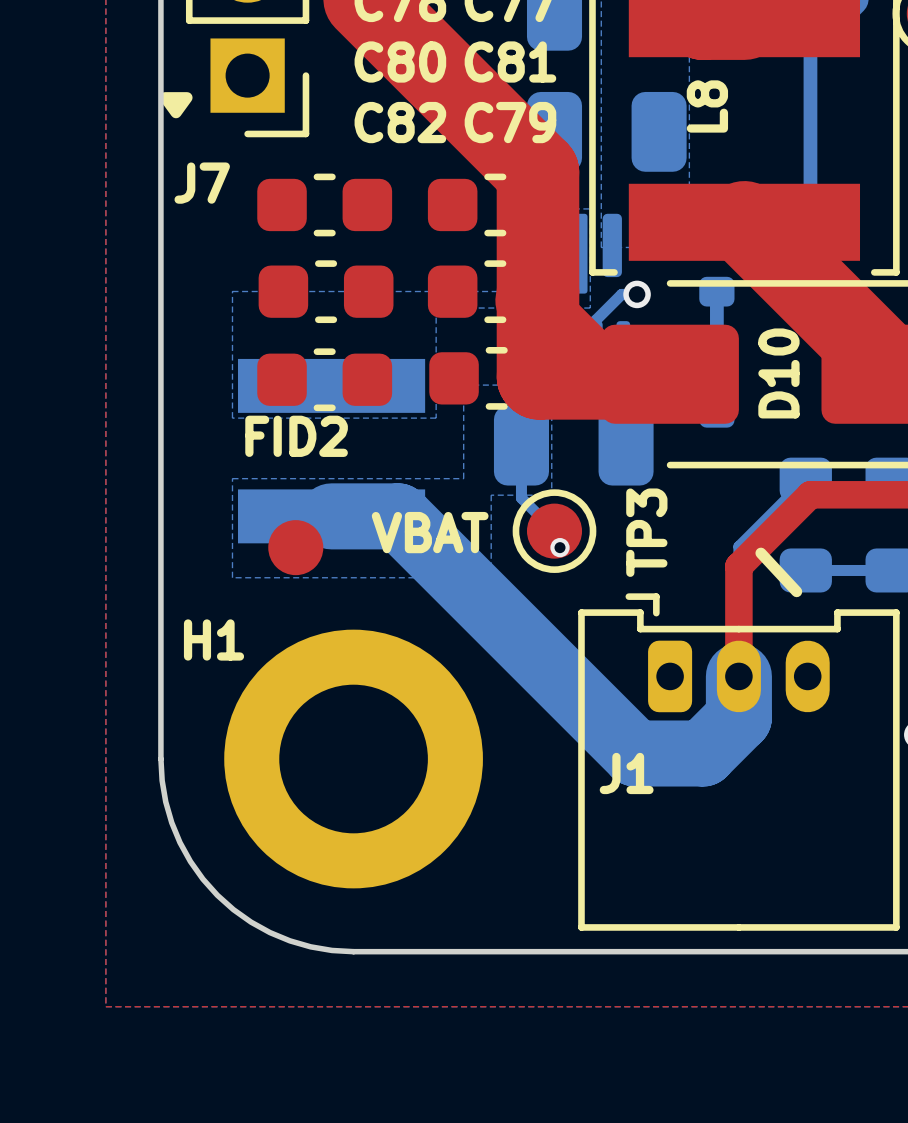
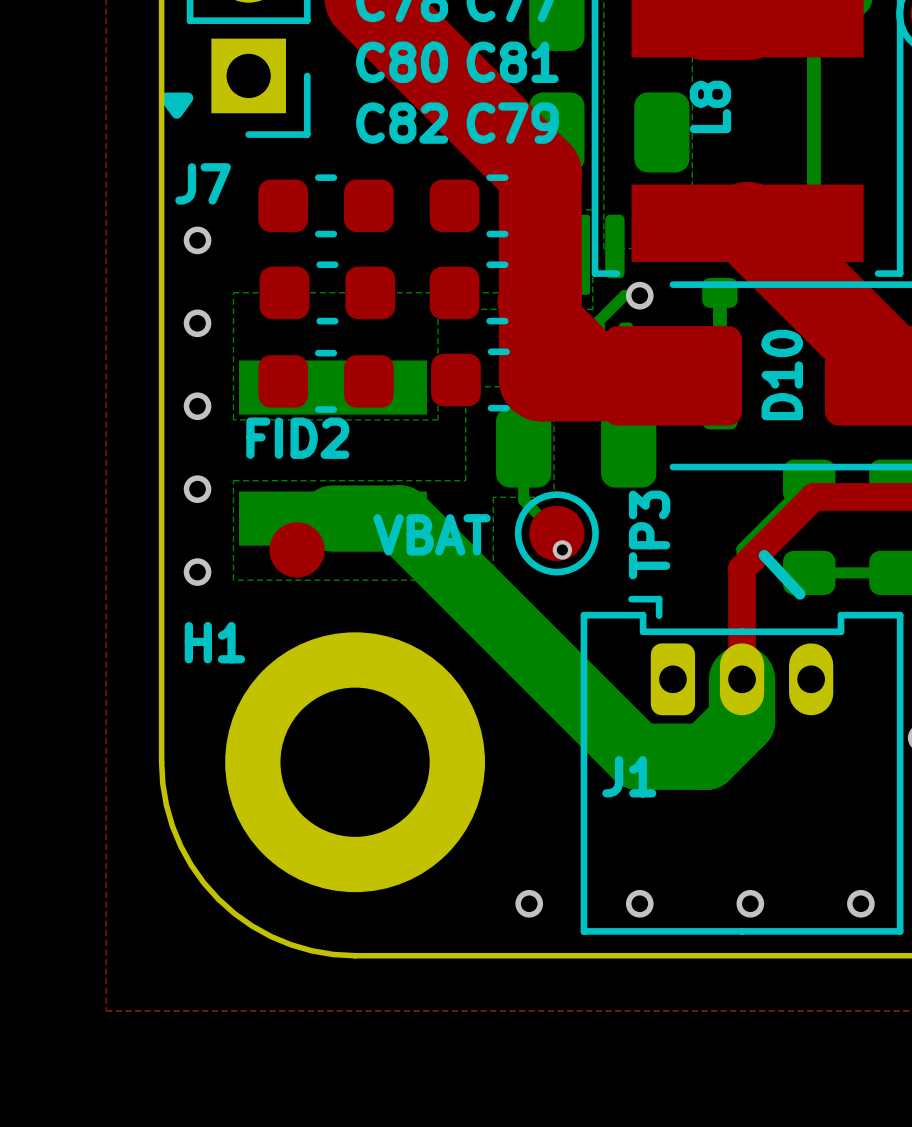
via: none -> (197, 240)
via: none -> (197, 323)
via: none -> (197, 406)
via: none -> (197, 489)
via: none -> (197, 572)
via: none -> (529, 903)
via: none -> (639, 903)
via: none -> (750, 903)
via: none -> (860, 903)

